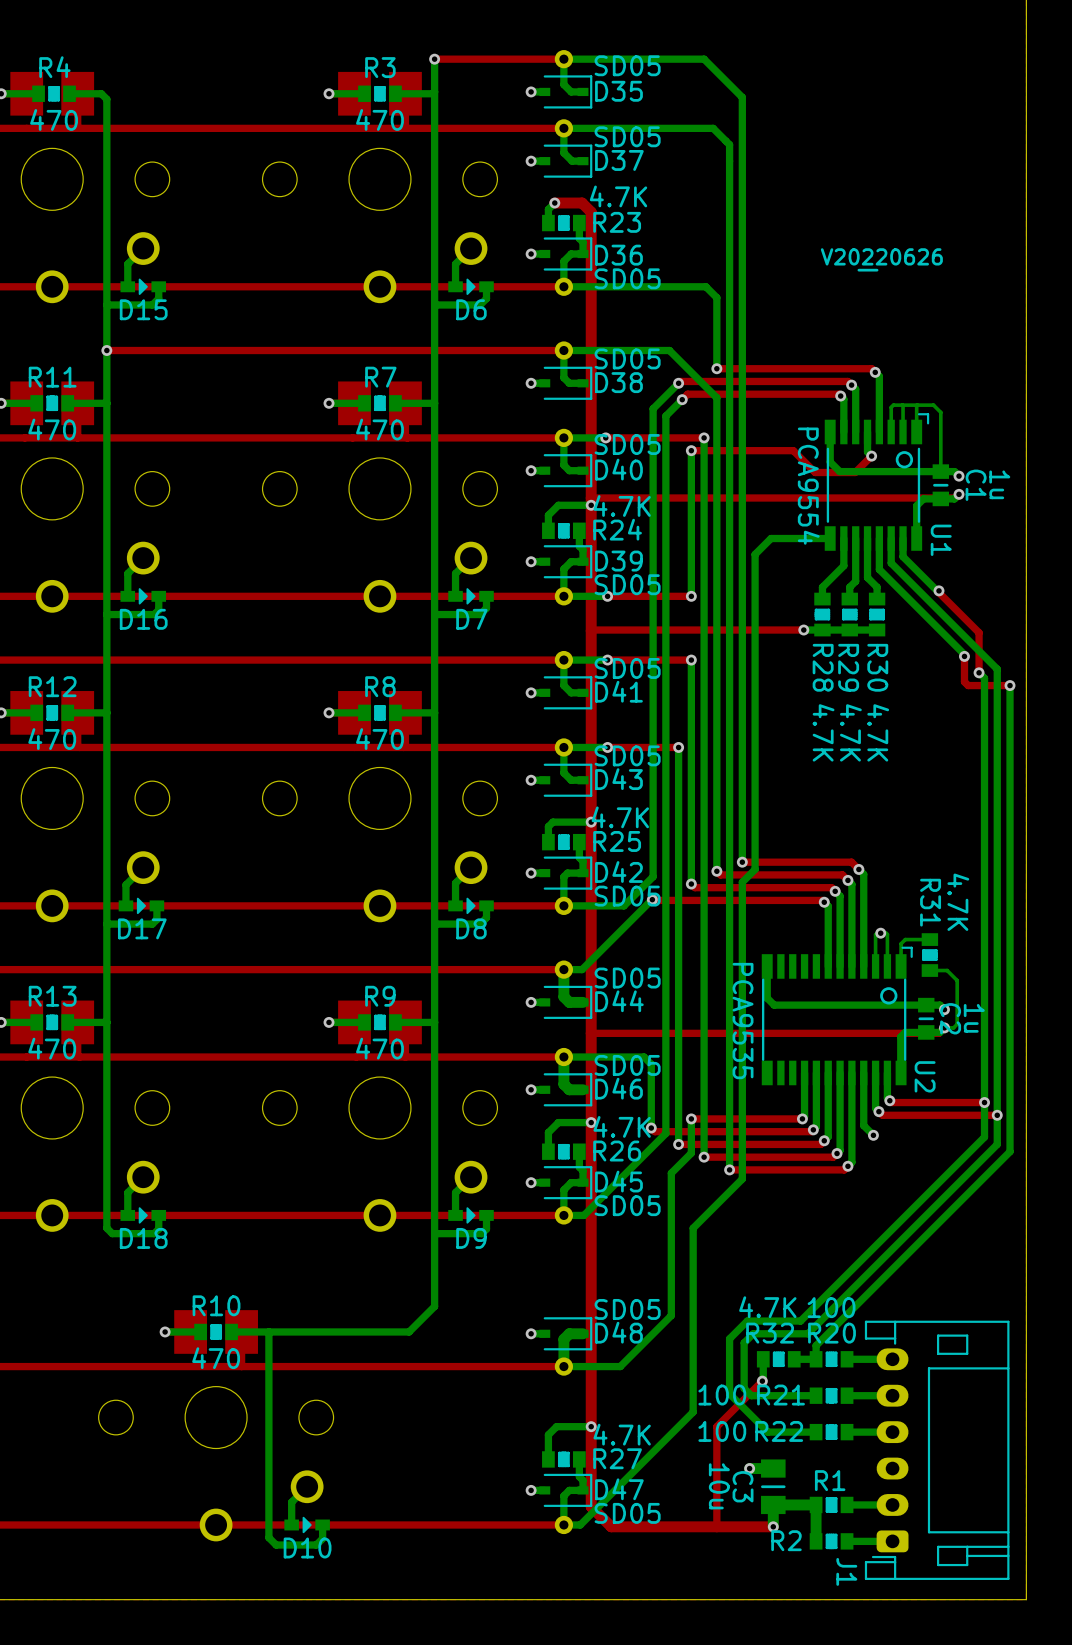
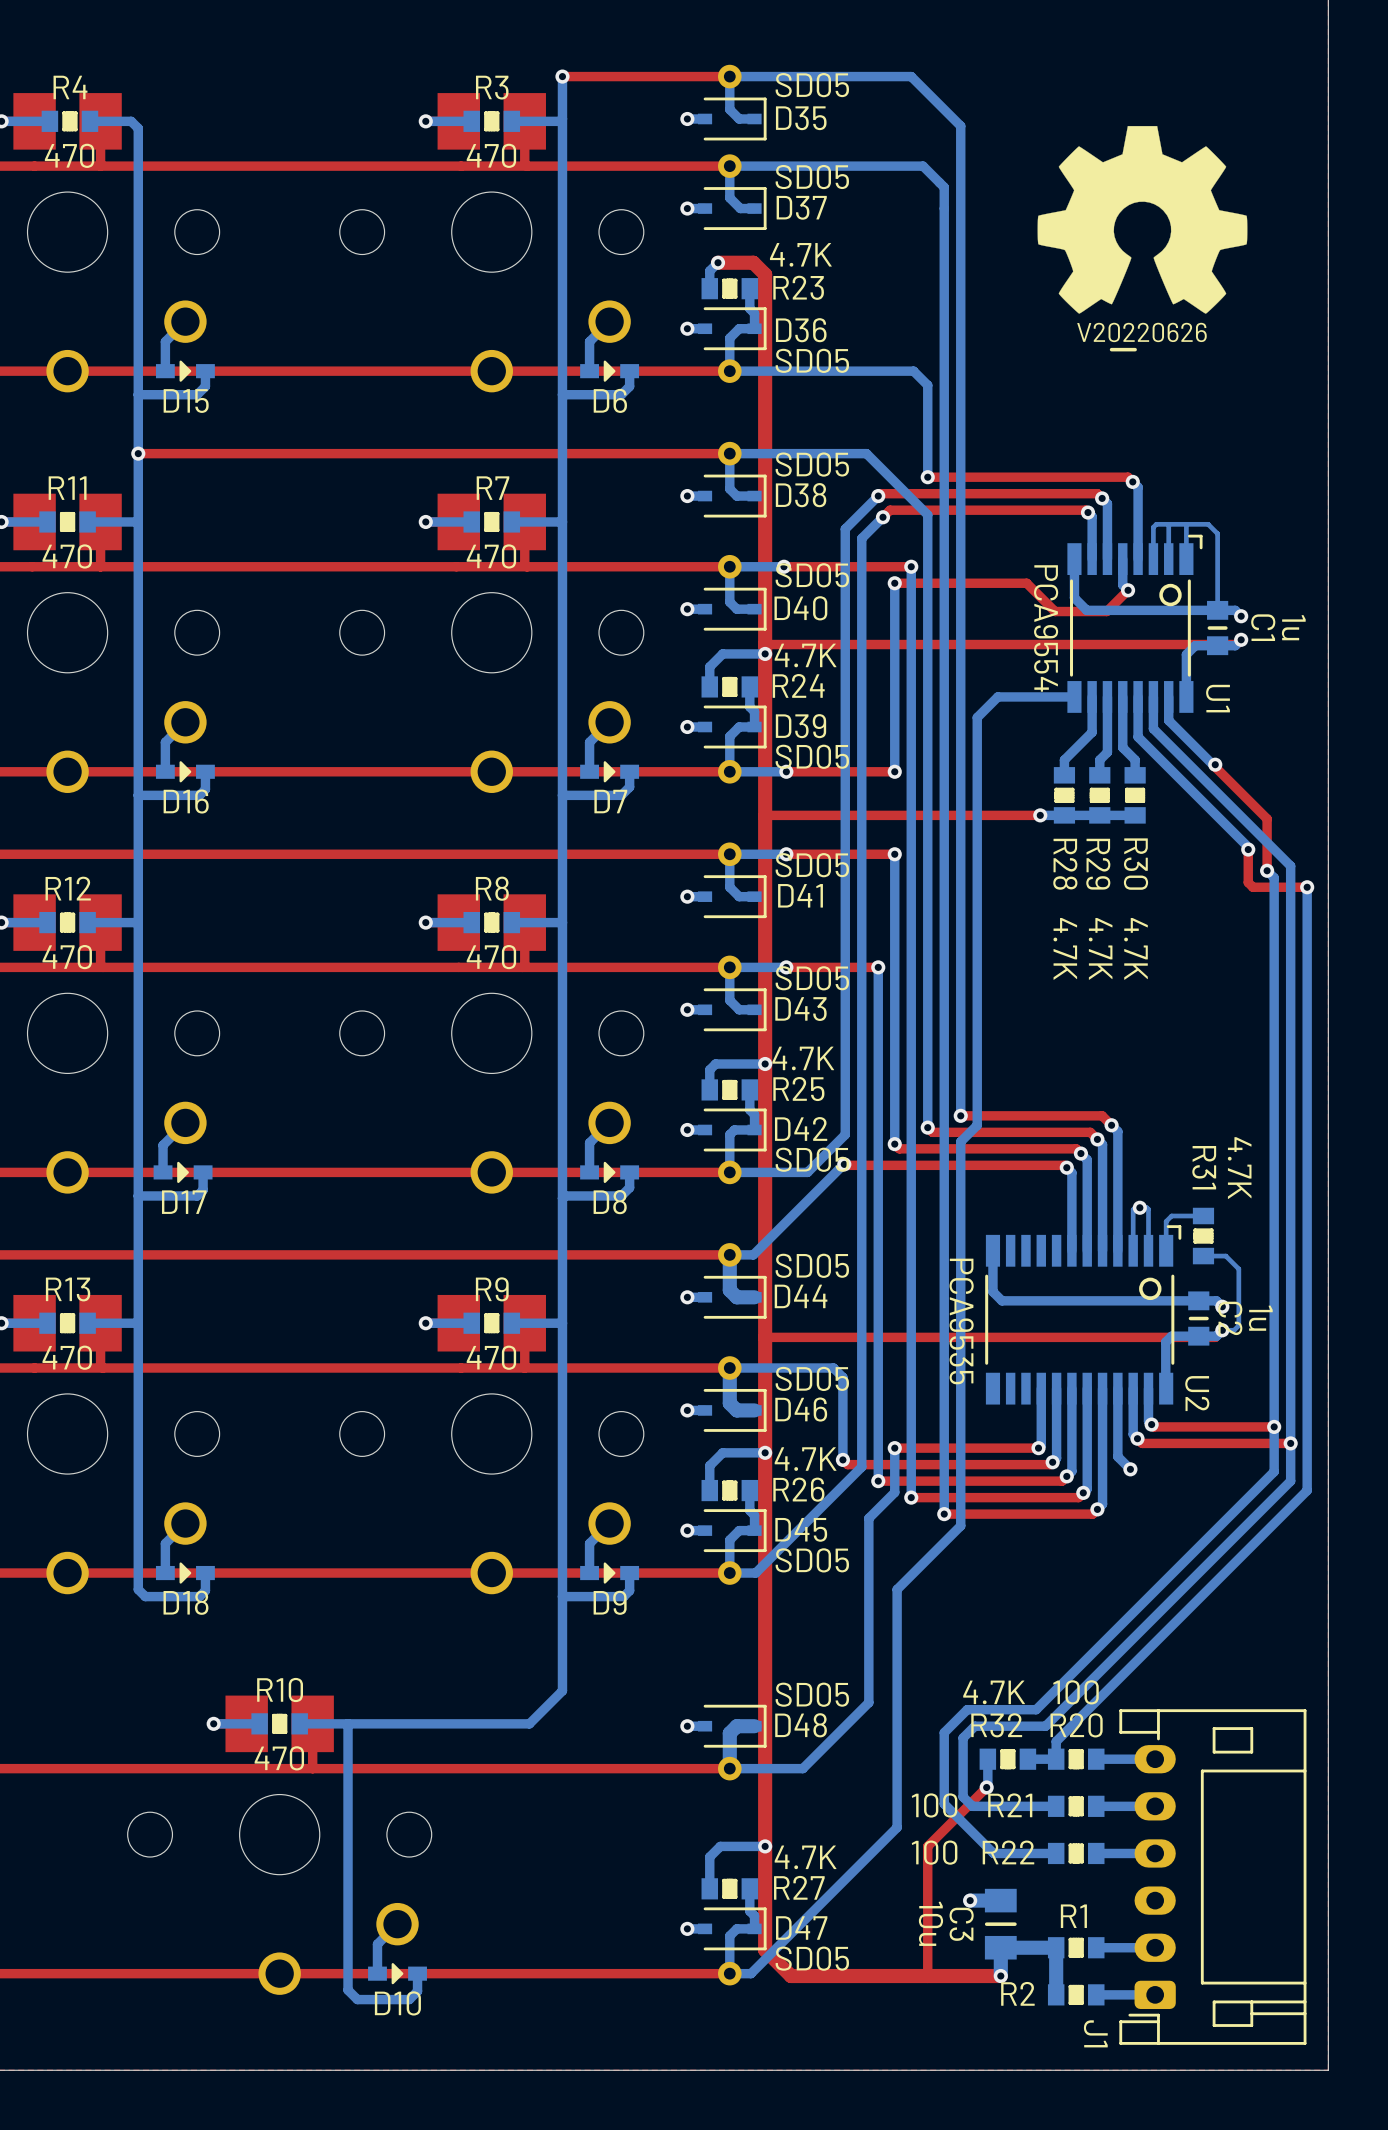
drawing: none -> [1037, 126, 1248, 314]
U2 footprint: [761, 946, 913, 1086] -> [985, 1225, 1182, 1405]

